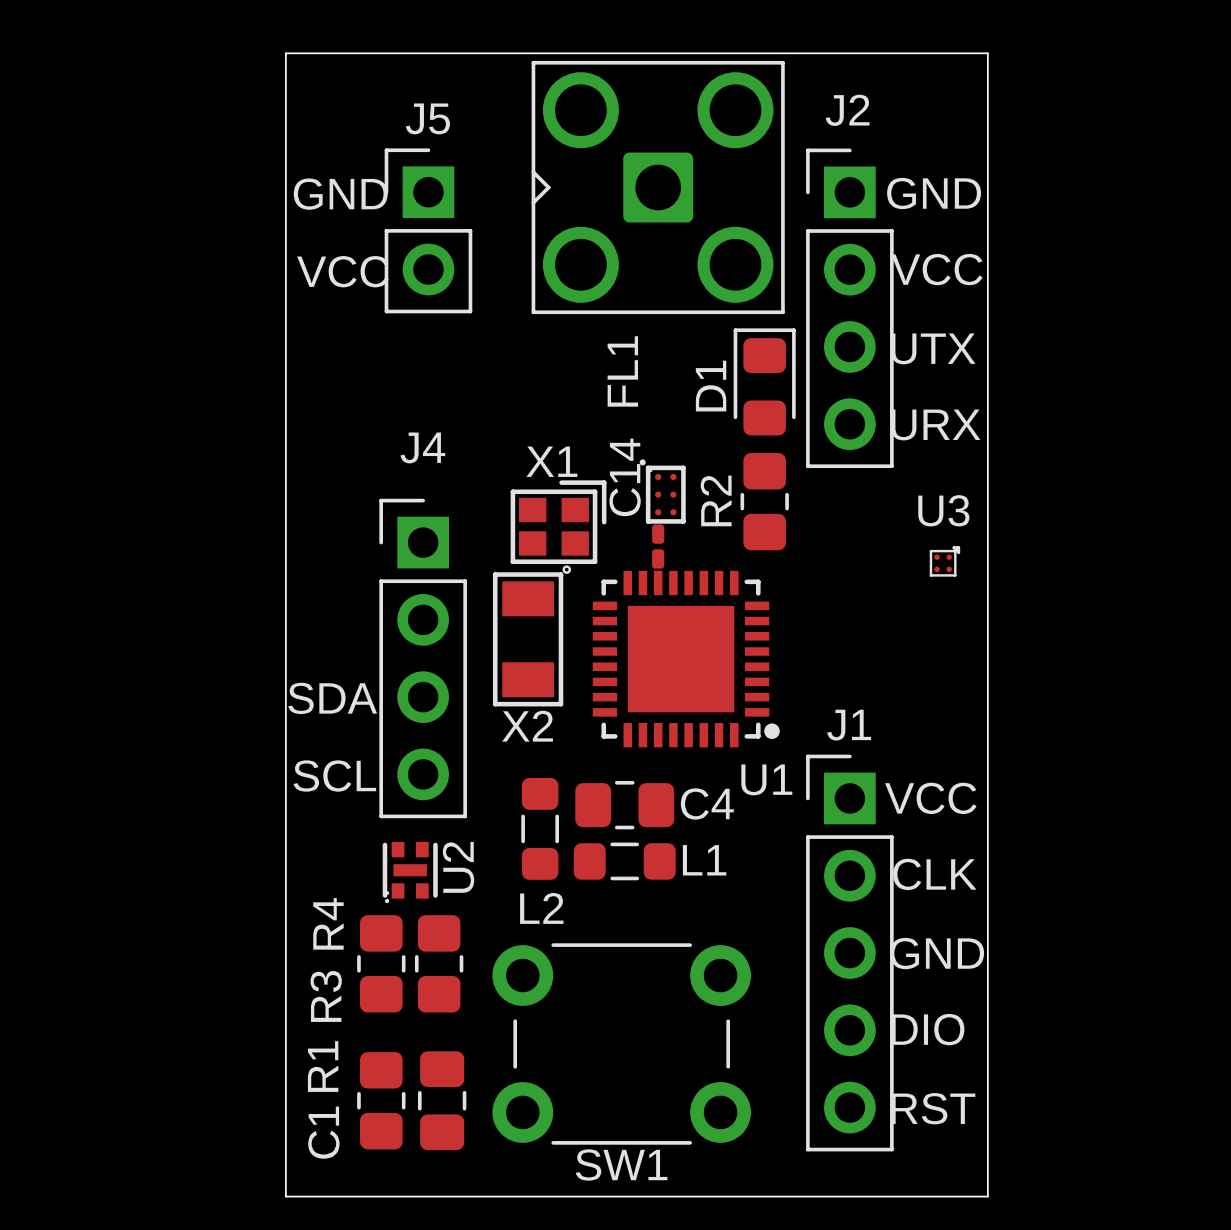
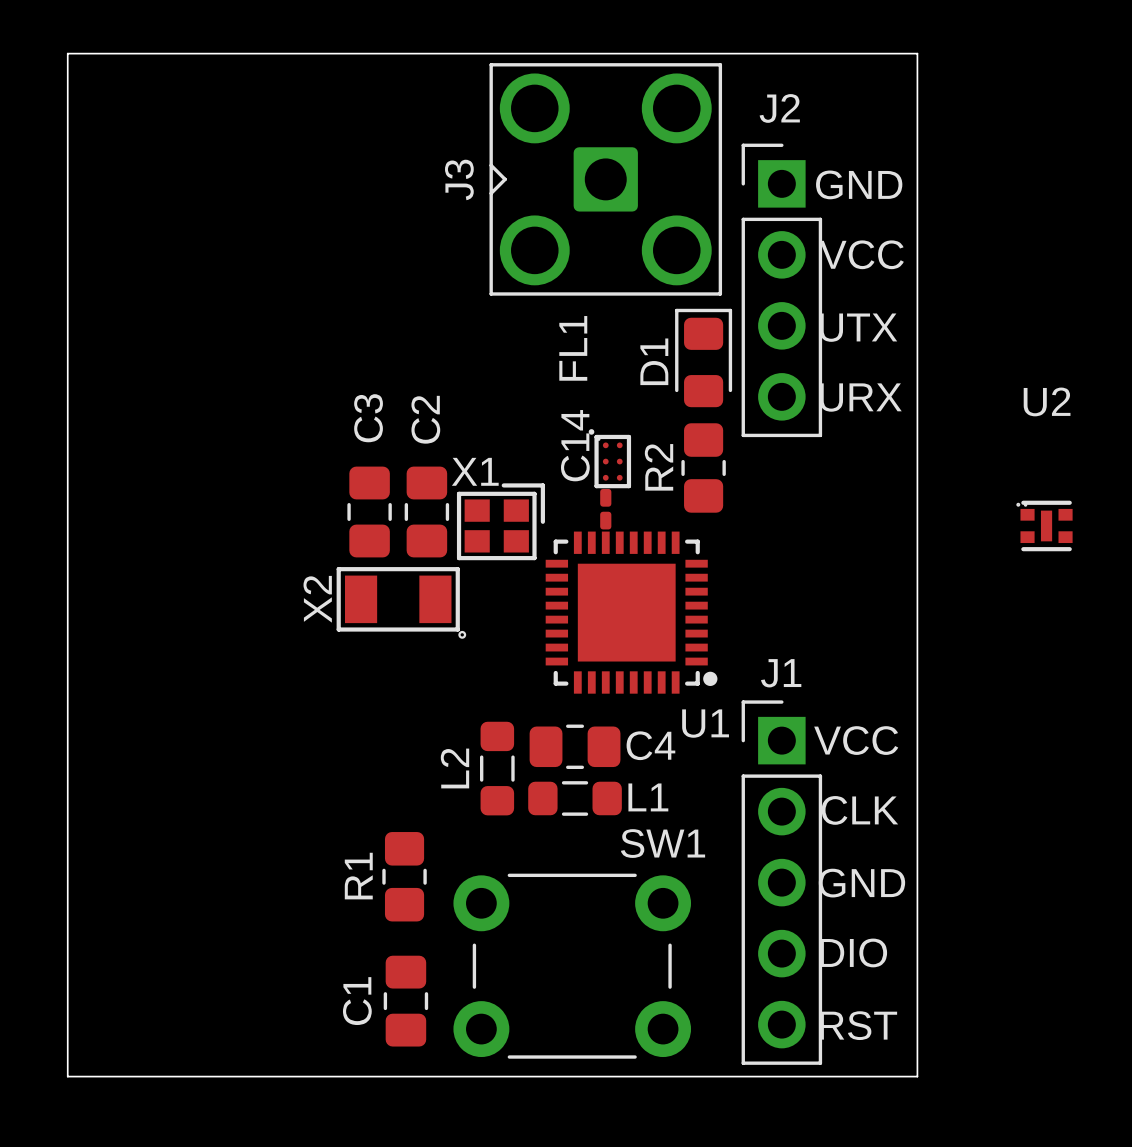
board edge: (285, 53) (987, 53) (987, 1196) (285, 1196) (285, 53) -> (67, 53) (67, 1076) (917, 1076) (917, 53) (67, 53)
J3 name: none -> J3 (459, 179)
text: GND (340, 194) -> none
J5: (428, 230) -> none
text: VCC (342, 271) -> none
X1 name position: X1 (551, 461) -> X1 (475, 471)
X1 position: (558, 522) -> (500, 521)
C3: none -> (369, 512)
C2: none -> (426, 512)
U3: (944, 561) -> none
X2 rotation: 0° (532, 635) -> 90° clockwise (401, 602)
X2 position: (532, 635) -> (401, 602)
J4: (423, 658) -> none
text: SDA (332, 698) -> none
text: SCL (334, 776) -> none
U2 name position: U2 (458, 867) -> U2 (1047, 401)
U2 rotation: 0° (410, 872) -> 90° clockwise (1044, 525)
U2 position: (410, 872) -> (1044, 525)
L2 name rotation: 0° (541, 908) -> 90° counterclockwise (454, 768)
L2 name position: L2 (541, 908) -> L2 (454, 768)
R4: (381, 963) -> none
R3: (439, 963) -> none
R1 name position: R1 (323, 1066) -> R1 (358, 876)
R1 position: (381, 1100) -> (404, 876)
C1 position: (442, 1100) -> (405, 1001)
C1 name position: C1 (323, 1132) -> C1 (357, 1001)
SW1 name position: SW1 (621, 1165) -> SW1 (663, 843)

